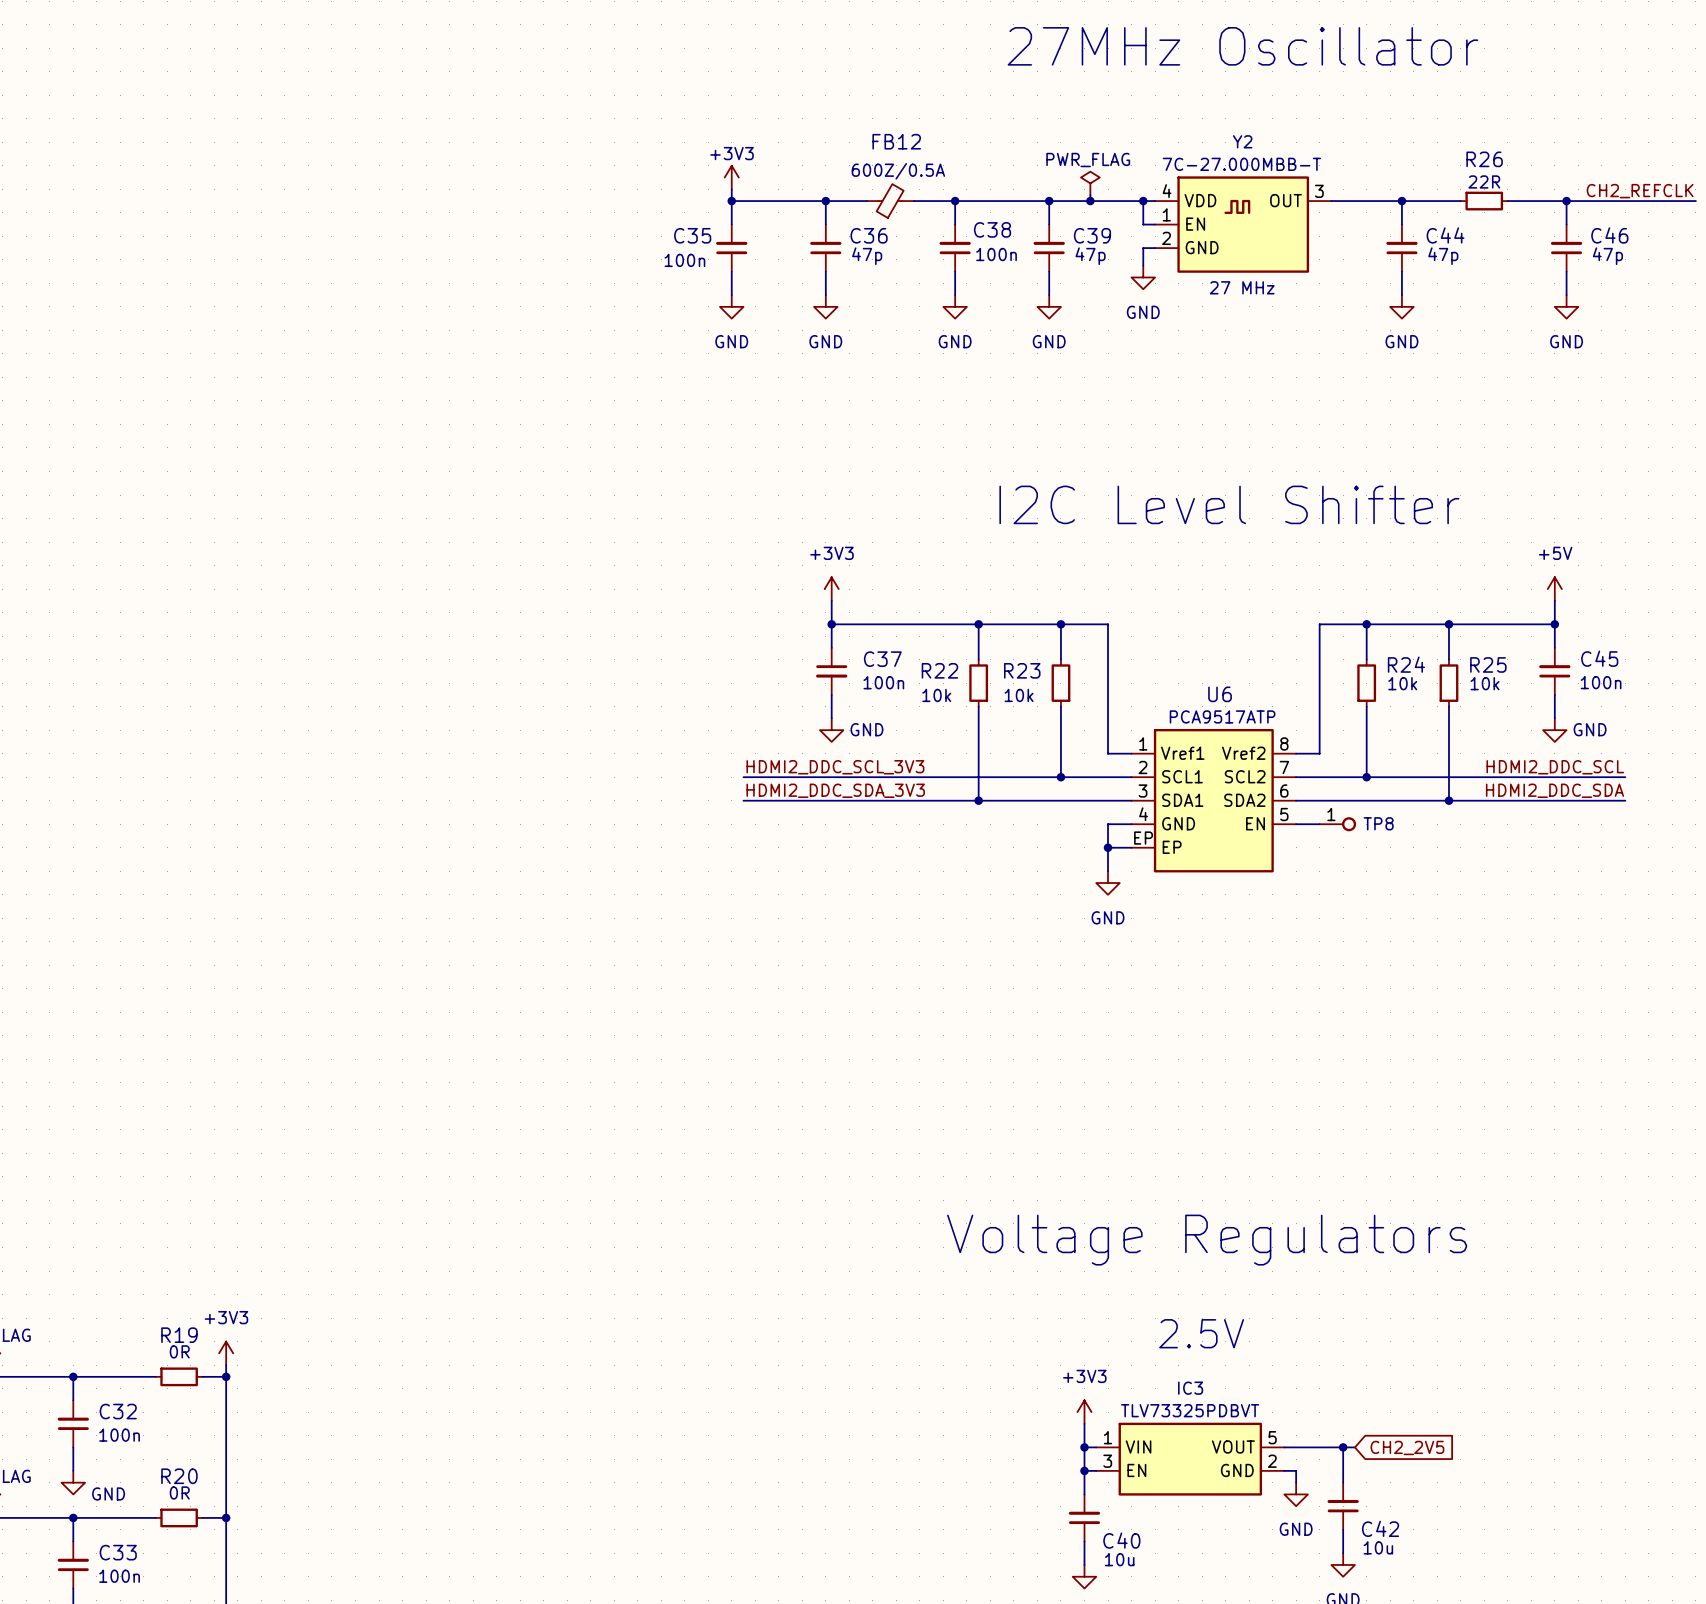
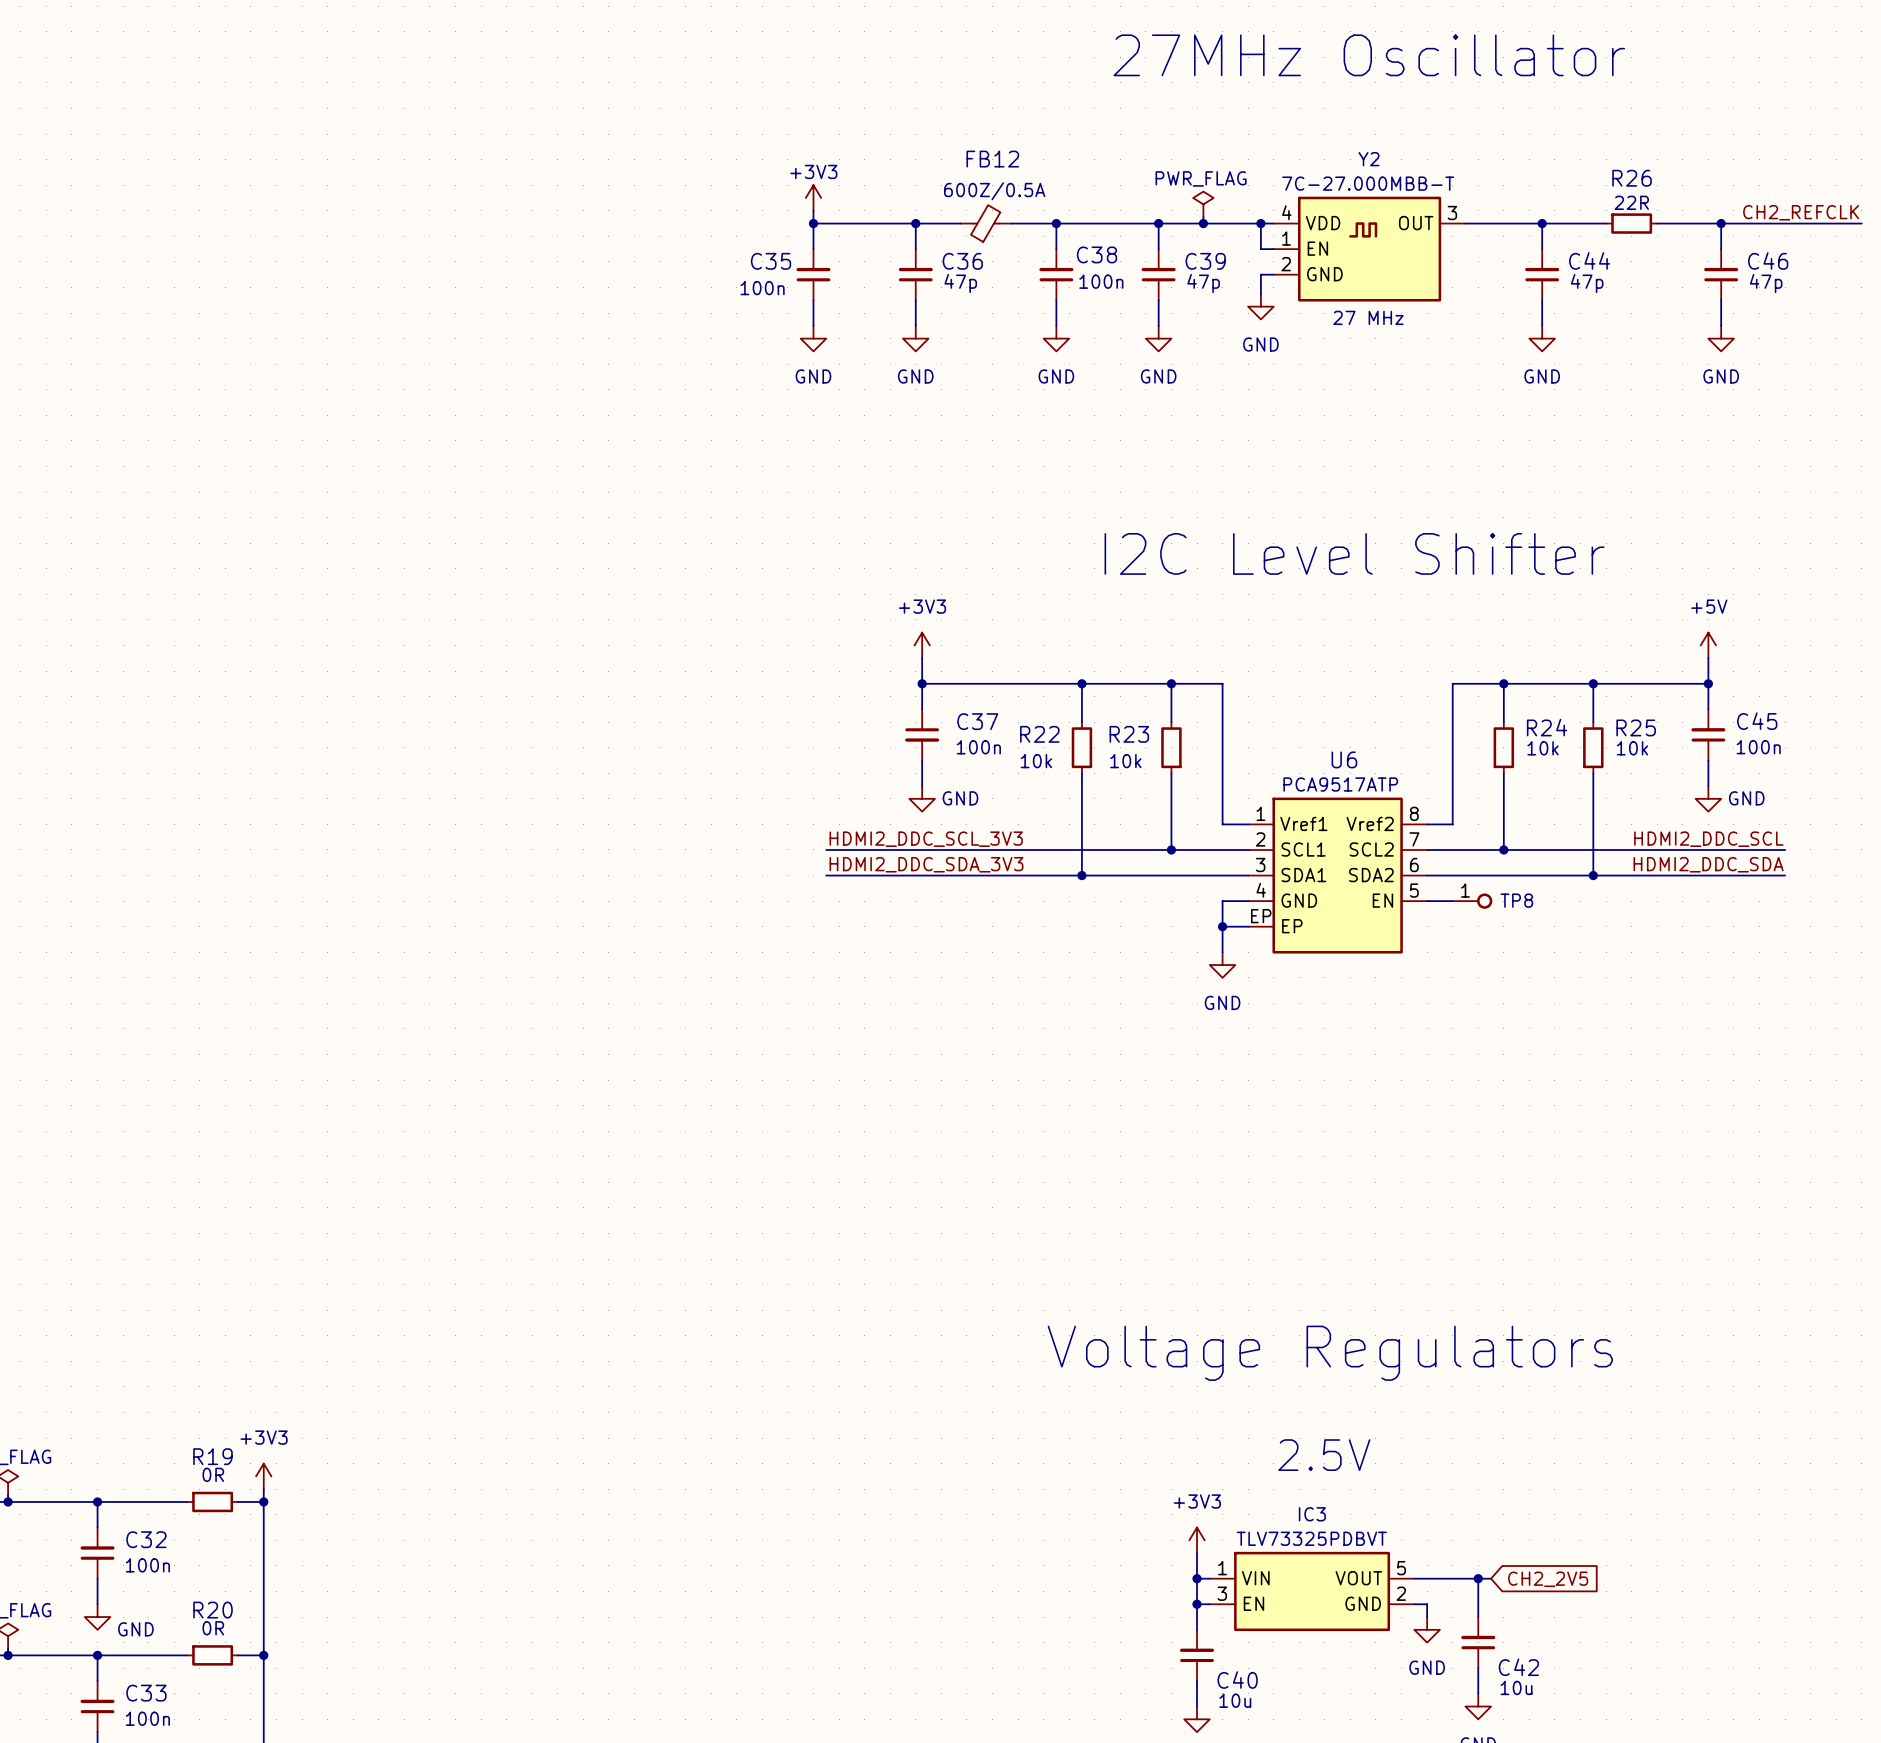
U6 text: none -> PCA9517ATP (1340, 784)
U6 value: PCA9517ATP (1222, 716) -> none

